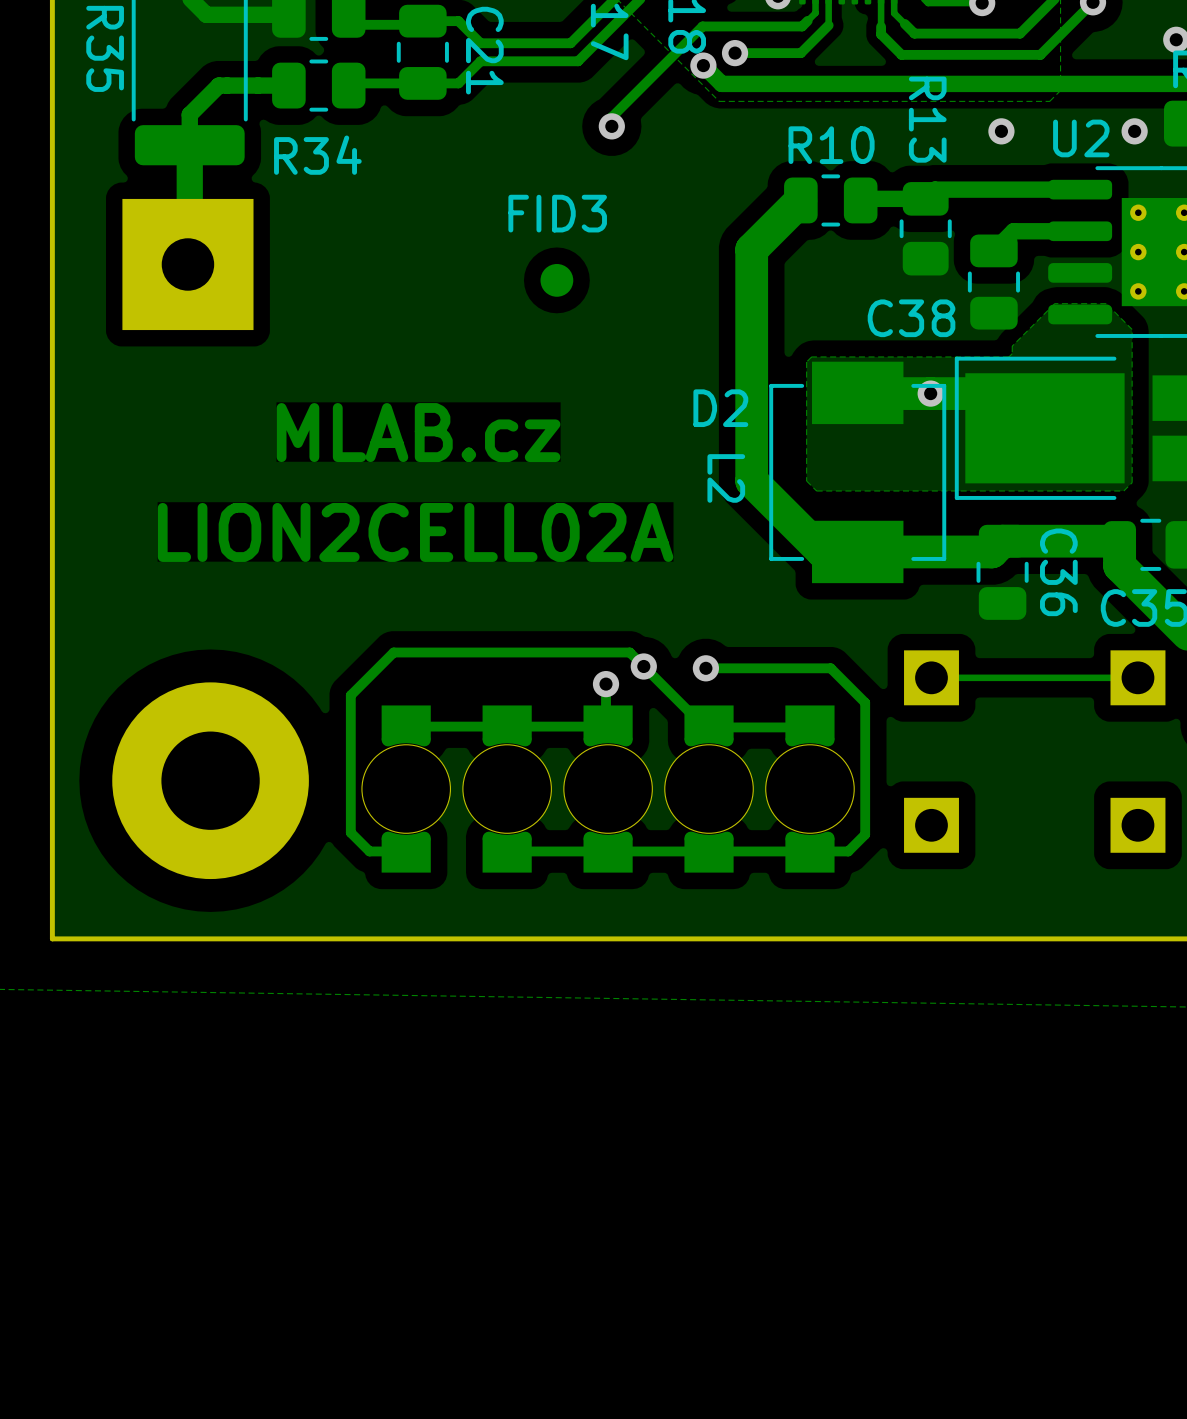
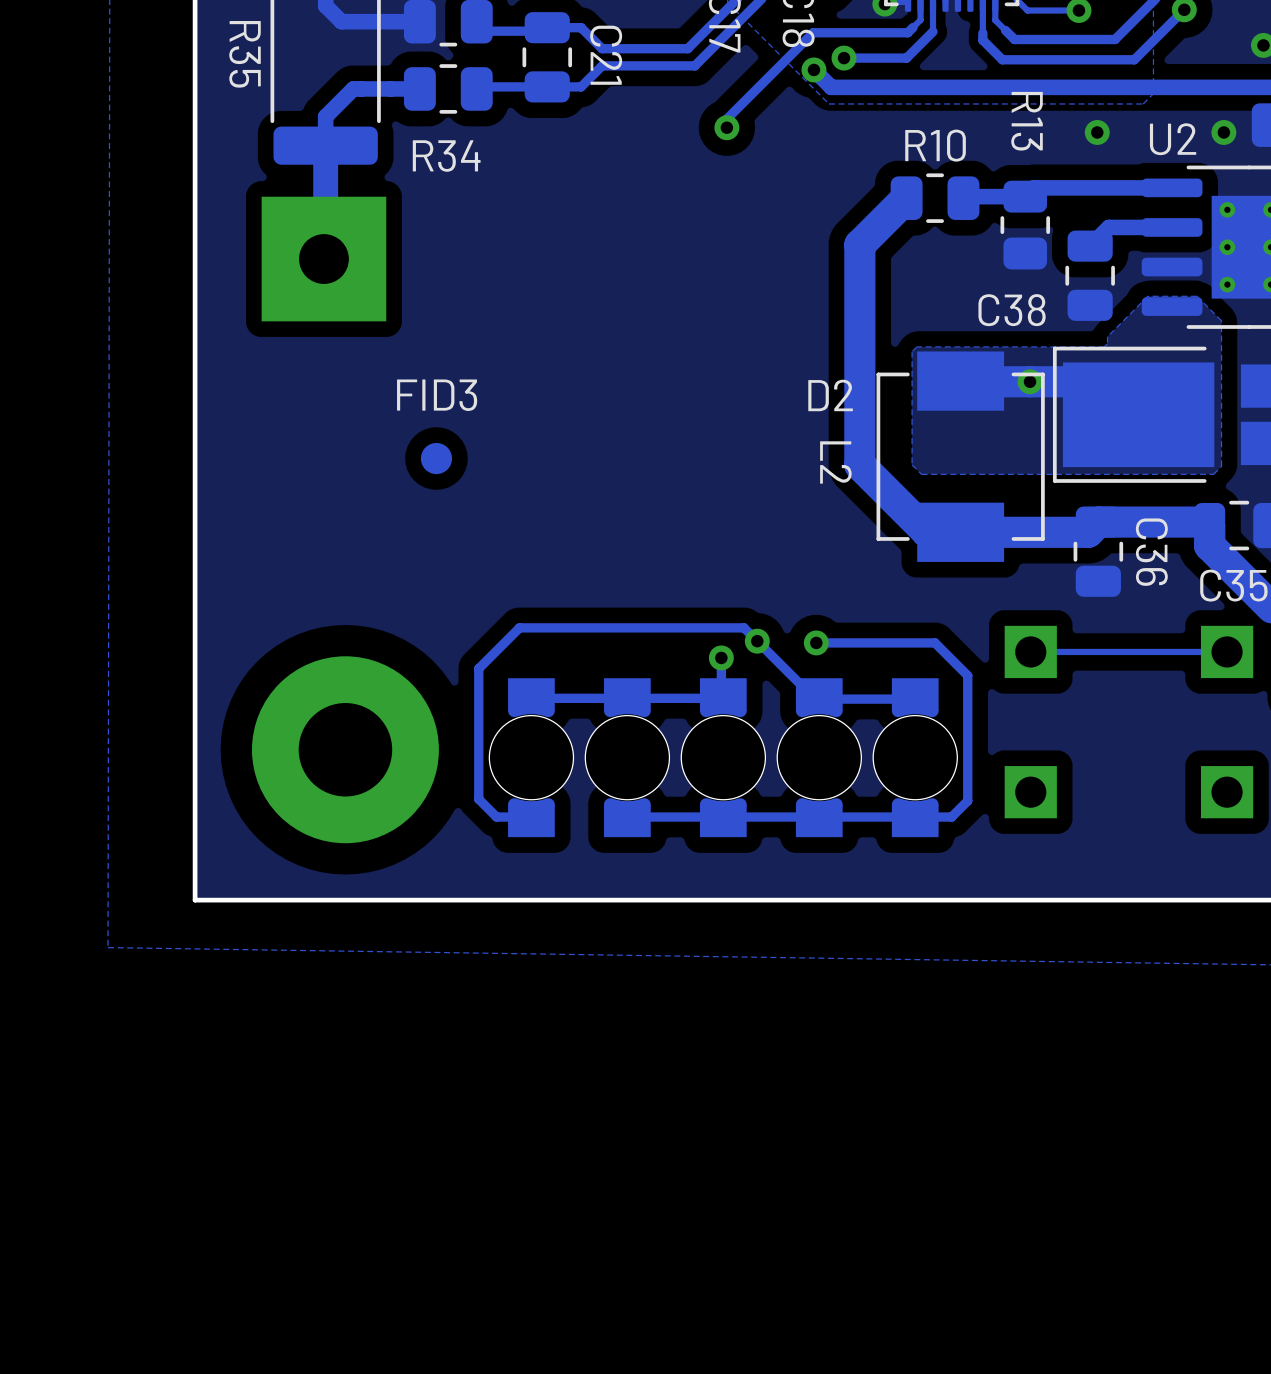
FID3 position: (556, 280) -> (436, 458)
text: MLAB.cz (418, 432) -> none
text: LION2CELL02A (415, 532) -> none

